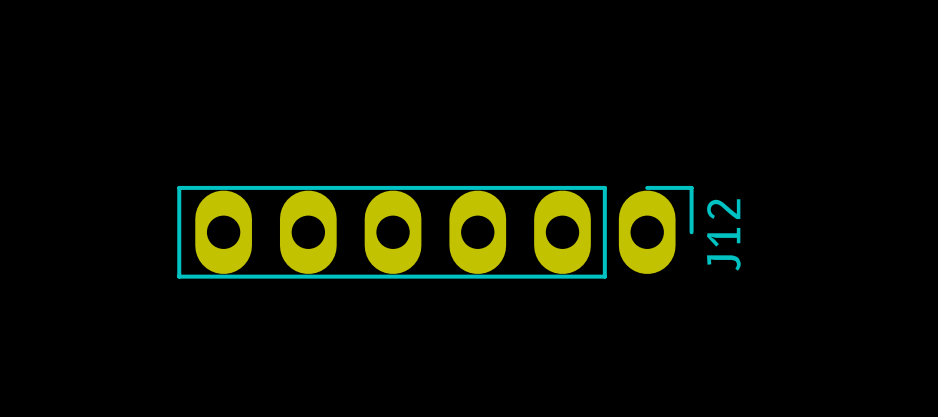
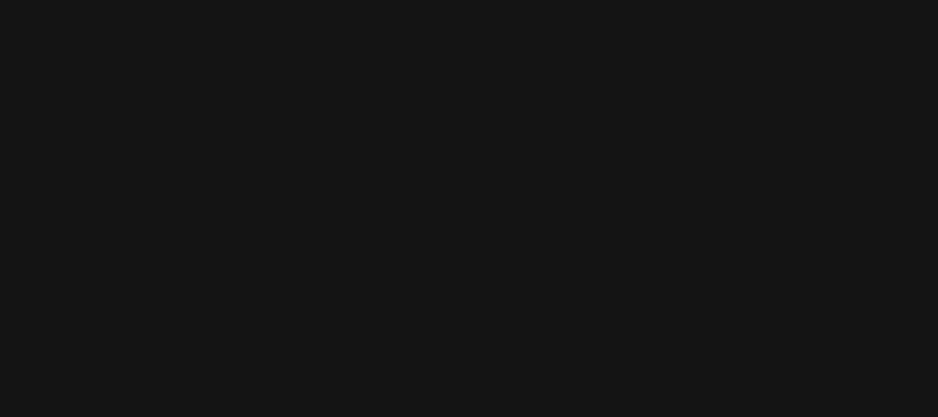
J12: (435, 232) -> none

